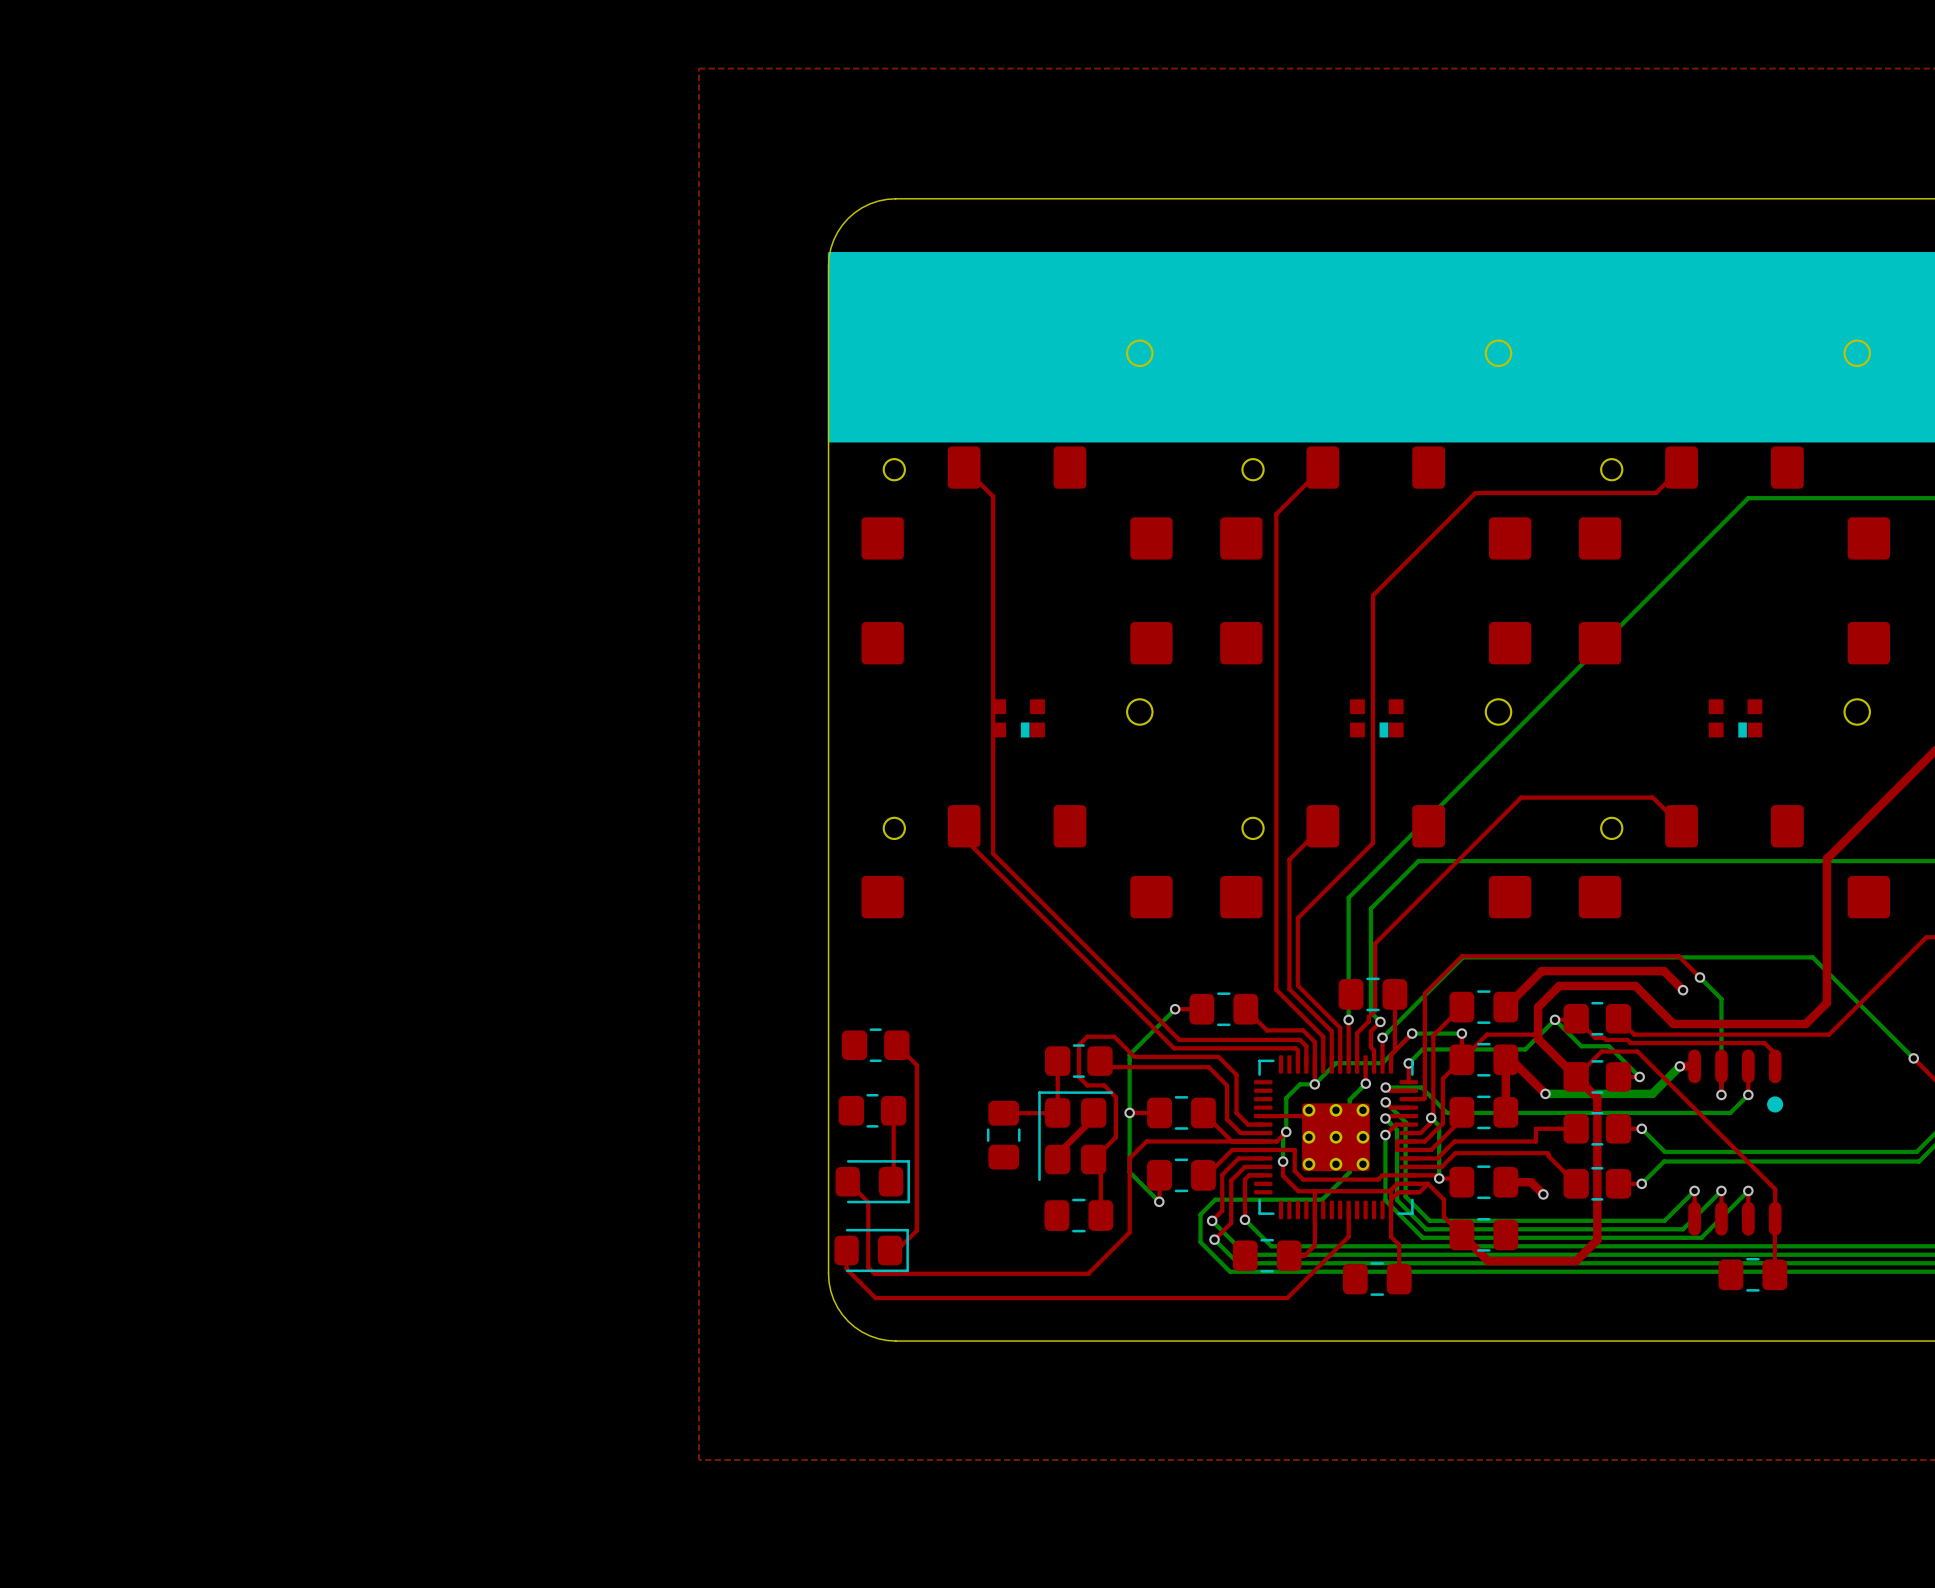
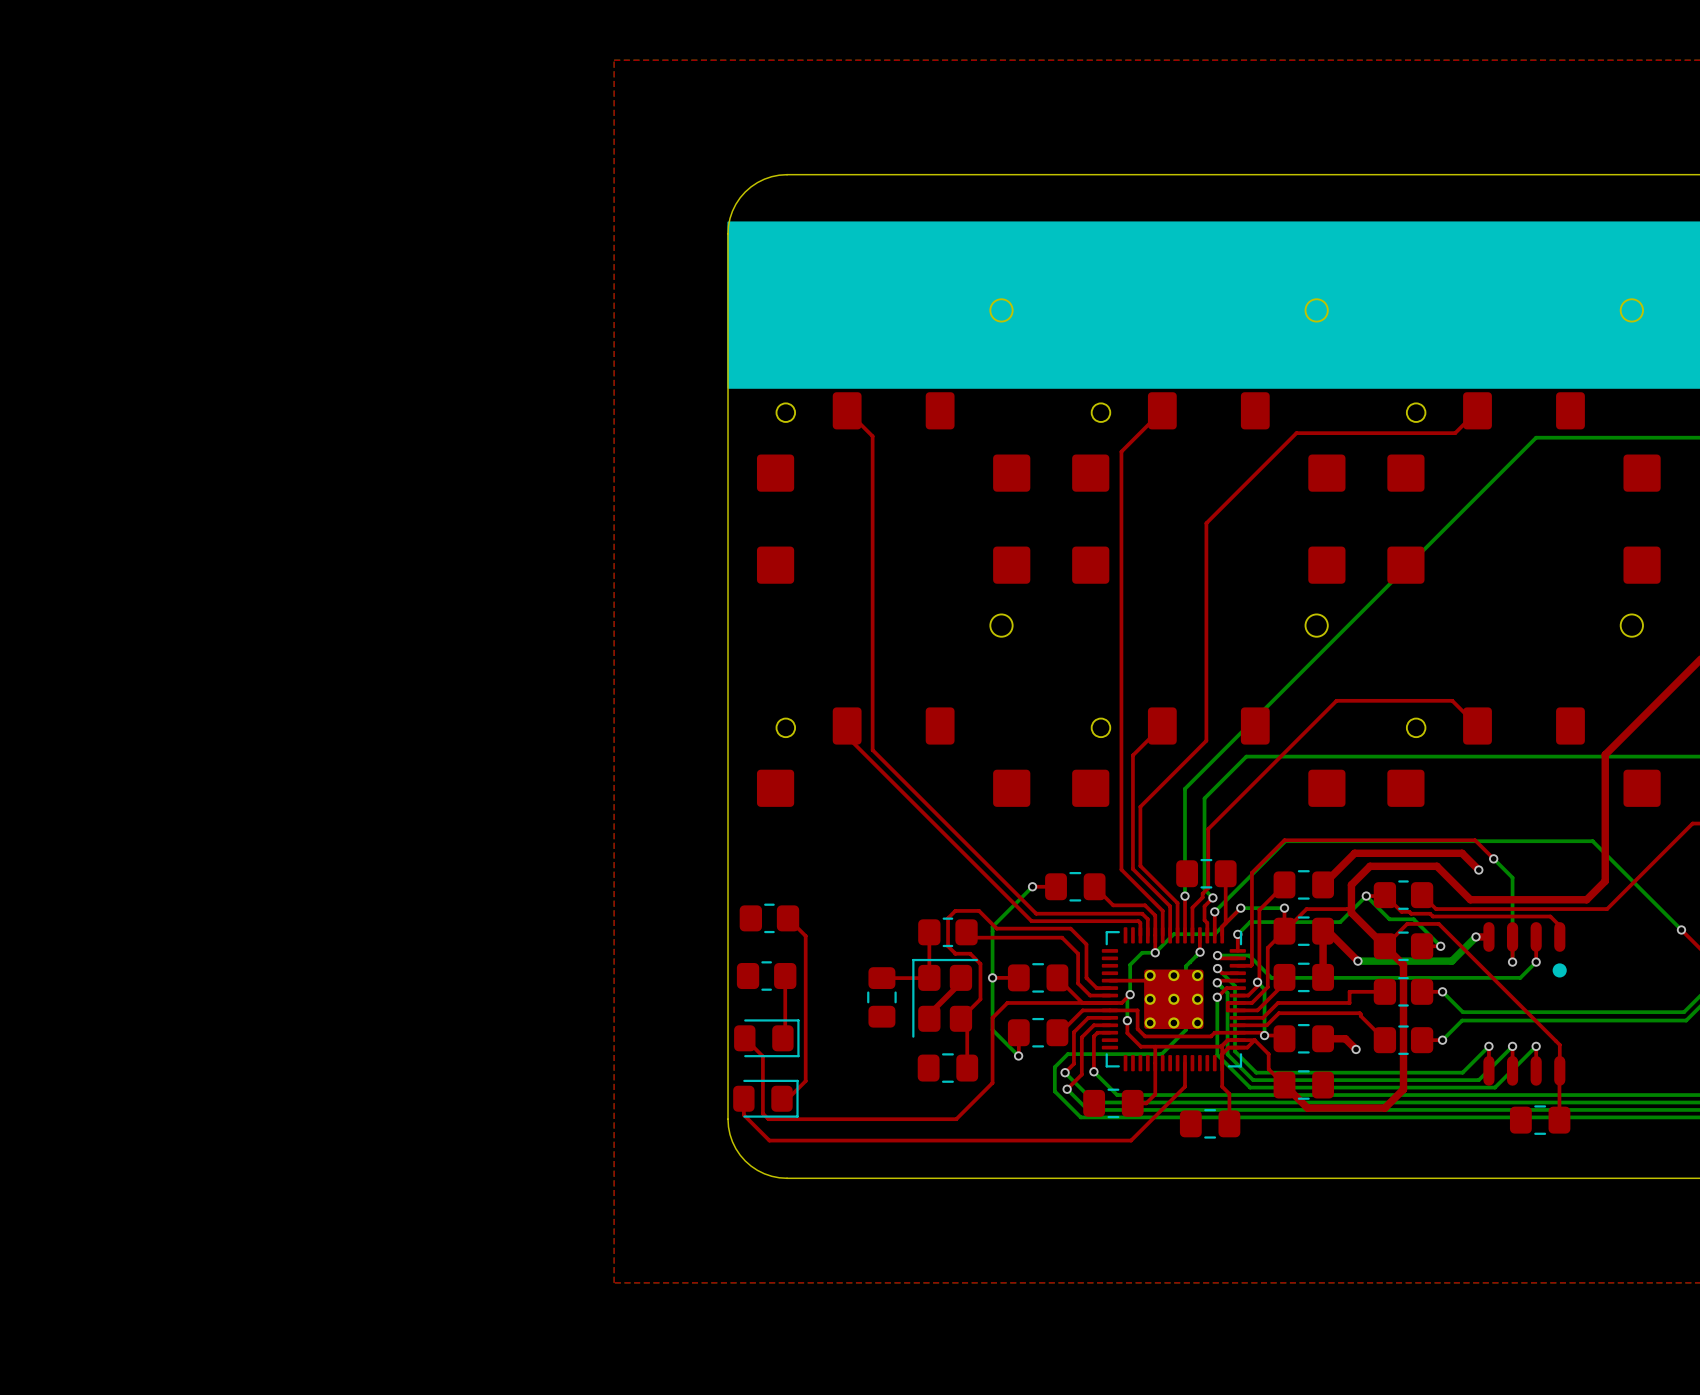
part: (1018, 718) -> none
part: (1376, 718) -> none
part: (1735, 718) -> none

